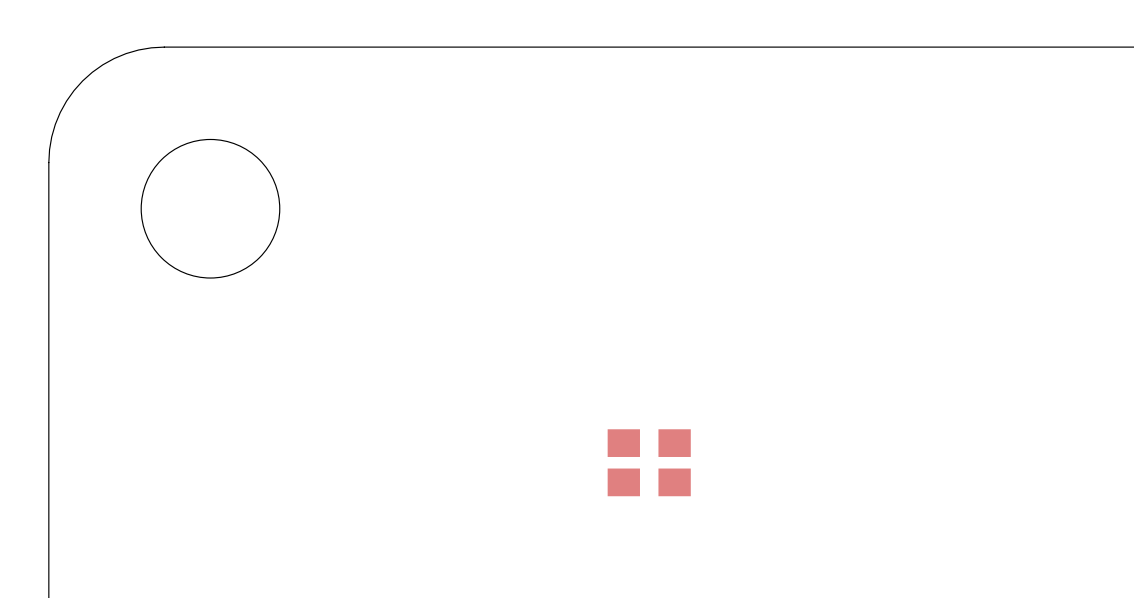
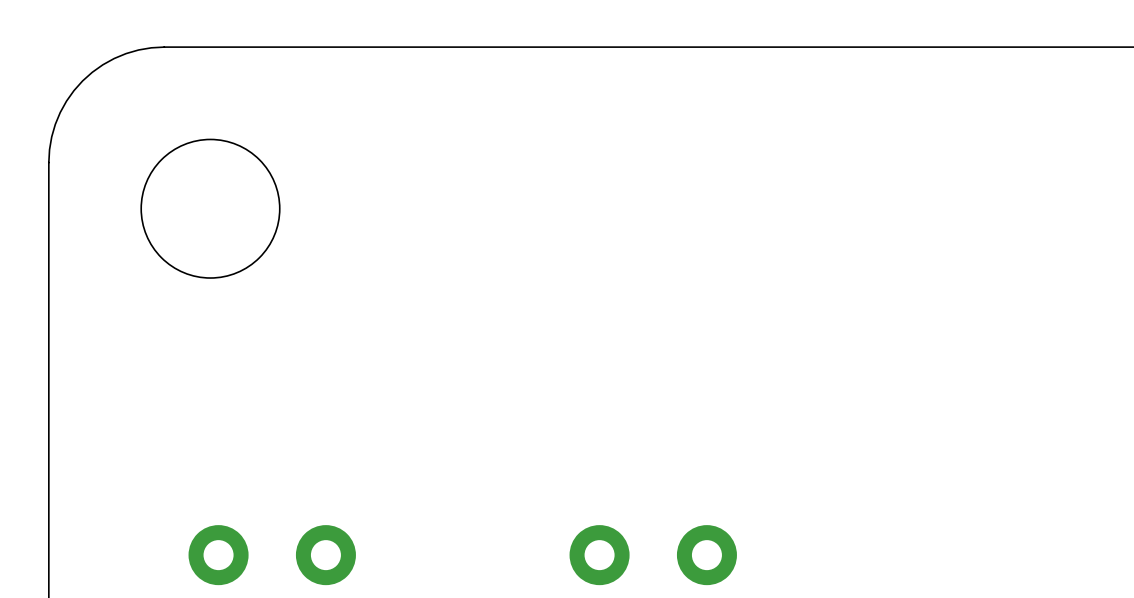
part: (649, 462) -> none
part: none -> (218, 555)
part: none -> (325, 555)
part: none -> (599, 555)
part: none -> (706, 555)

